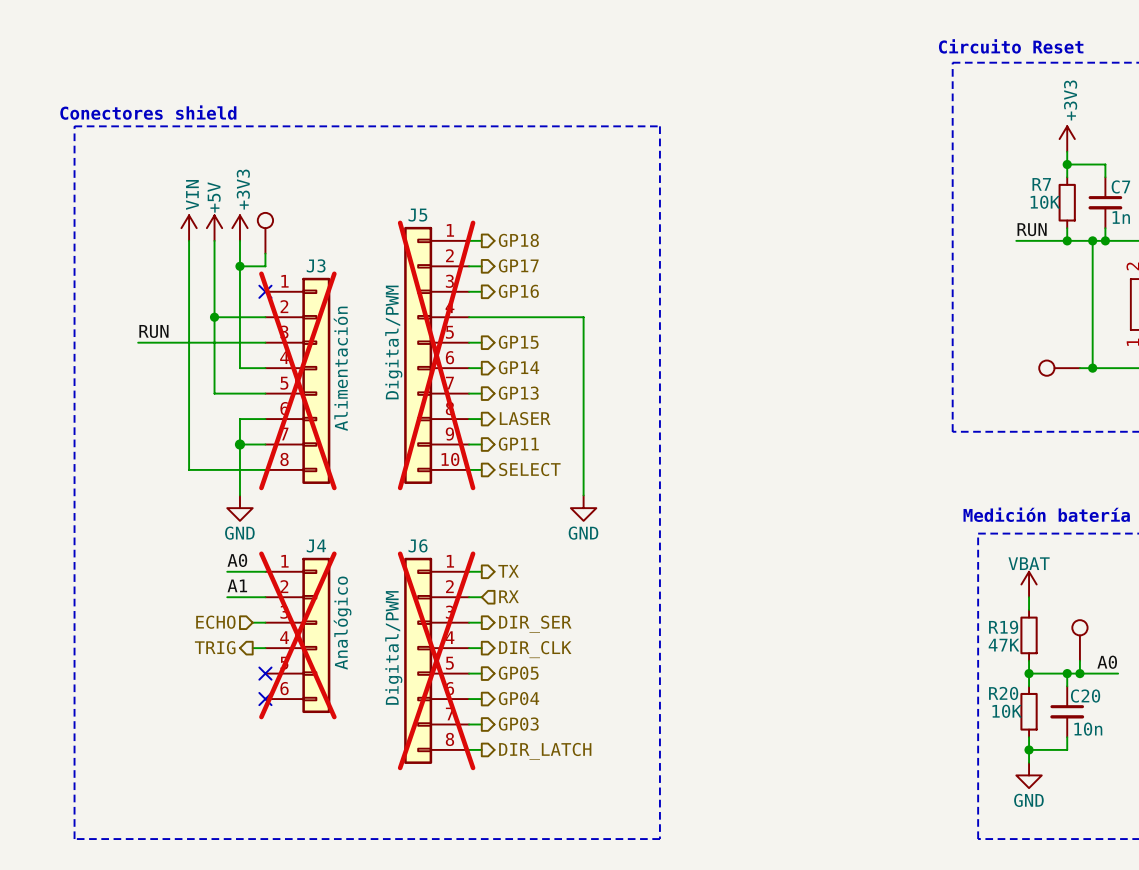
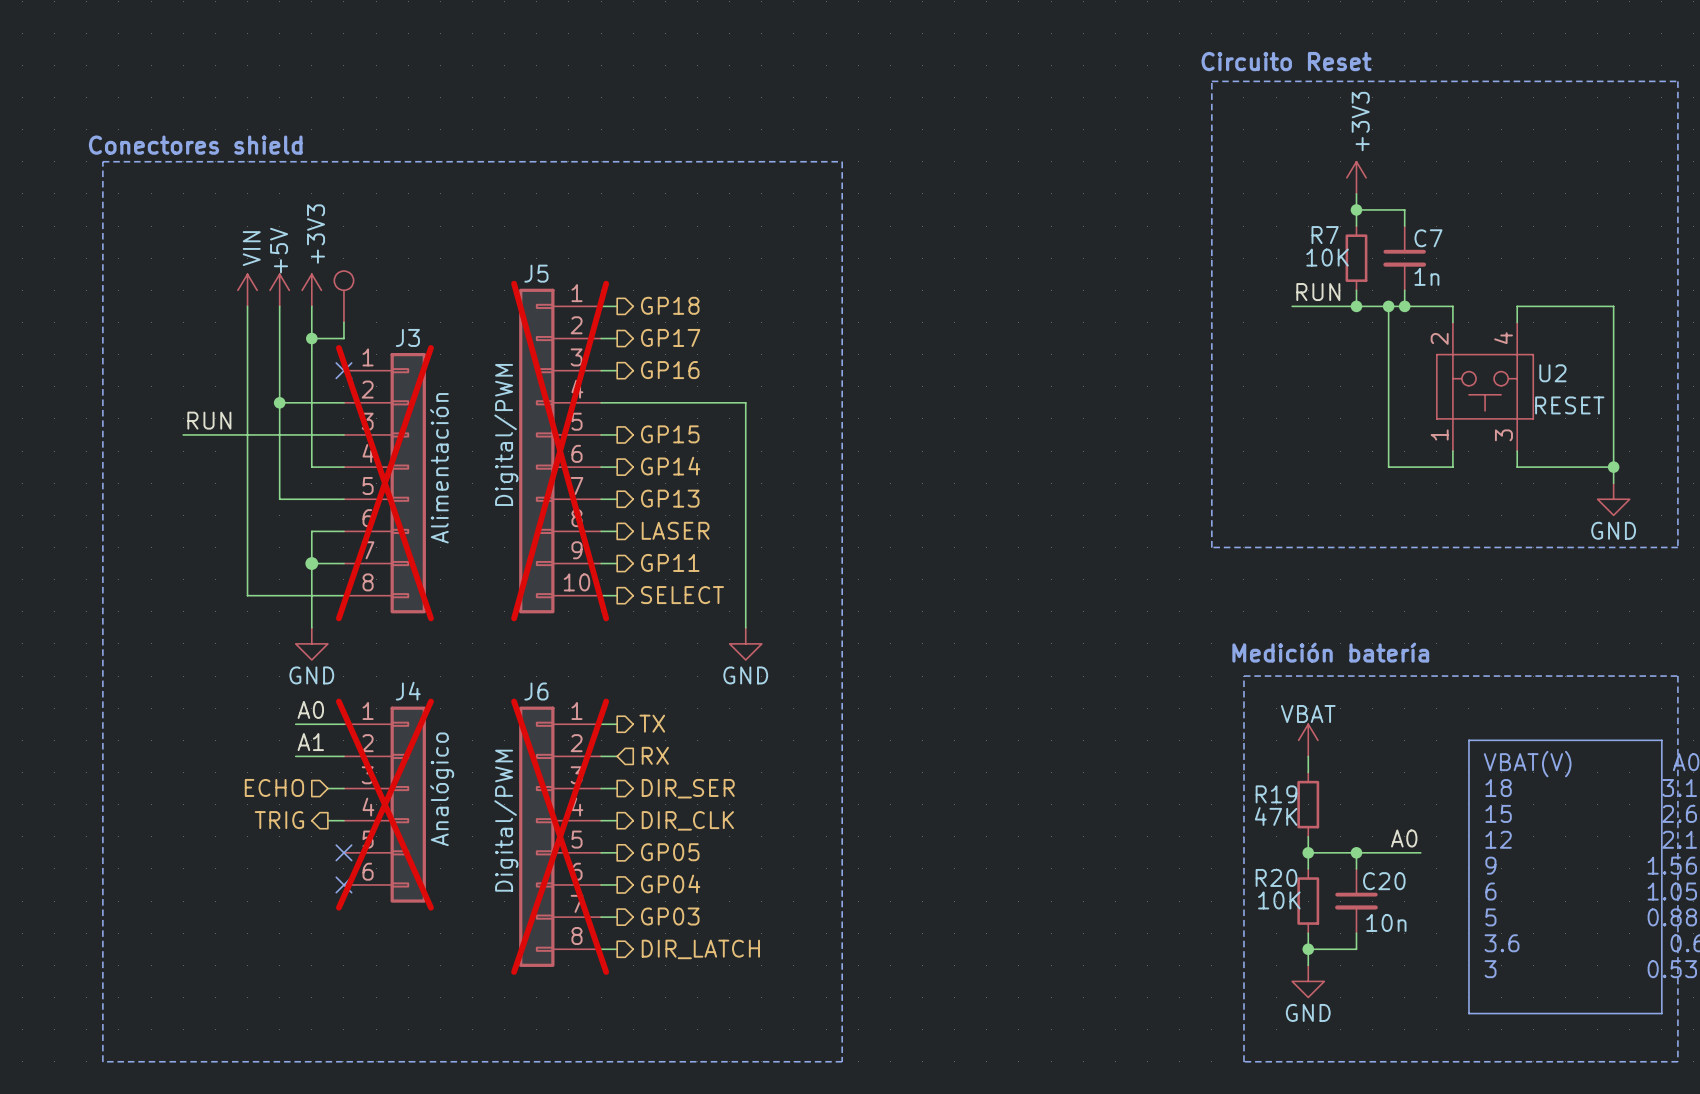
part: (1059, 368) -> none
wire: (1079, 368) (1092, 368) -> none
junction: (1092, 368) -> none
part: (1079, 640) -> none
wire: (1079, 660) (1079, 673) -> none
junction: (1079, 673) -> none

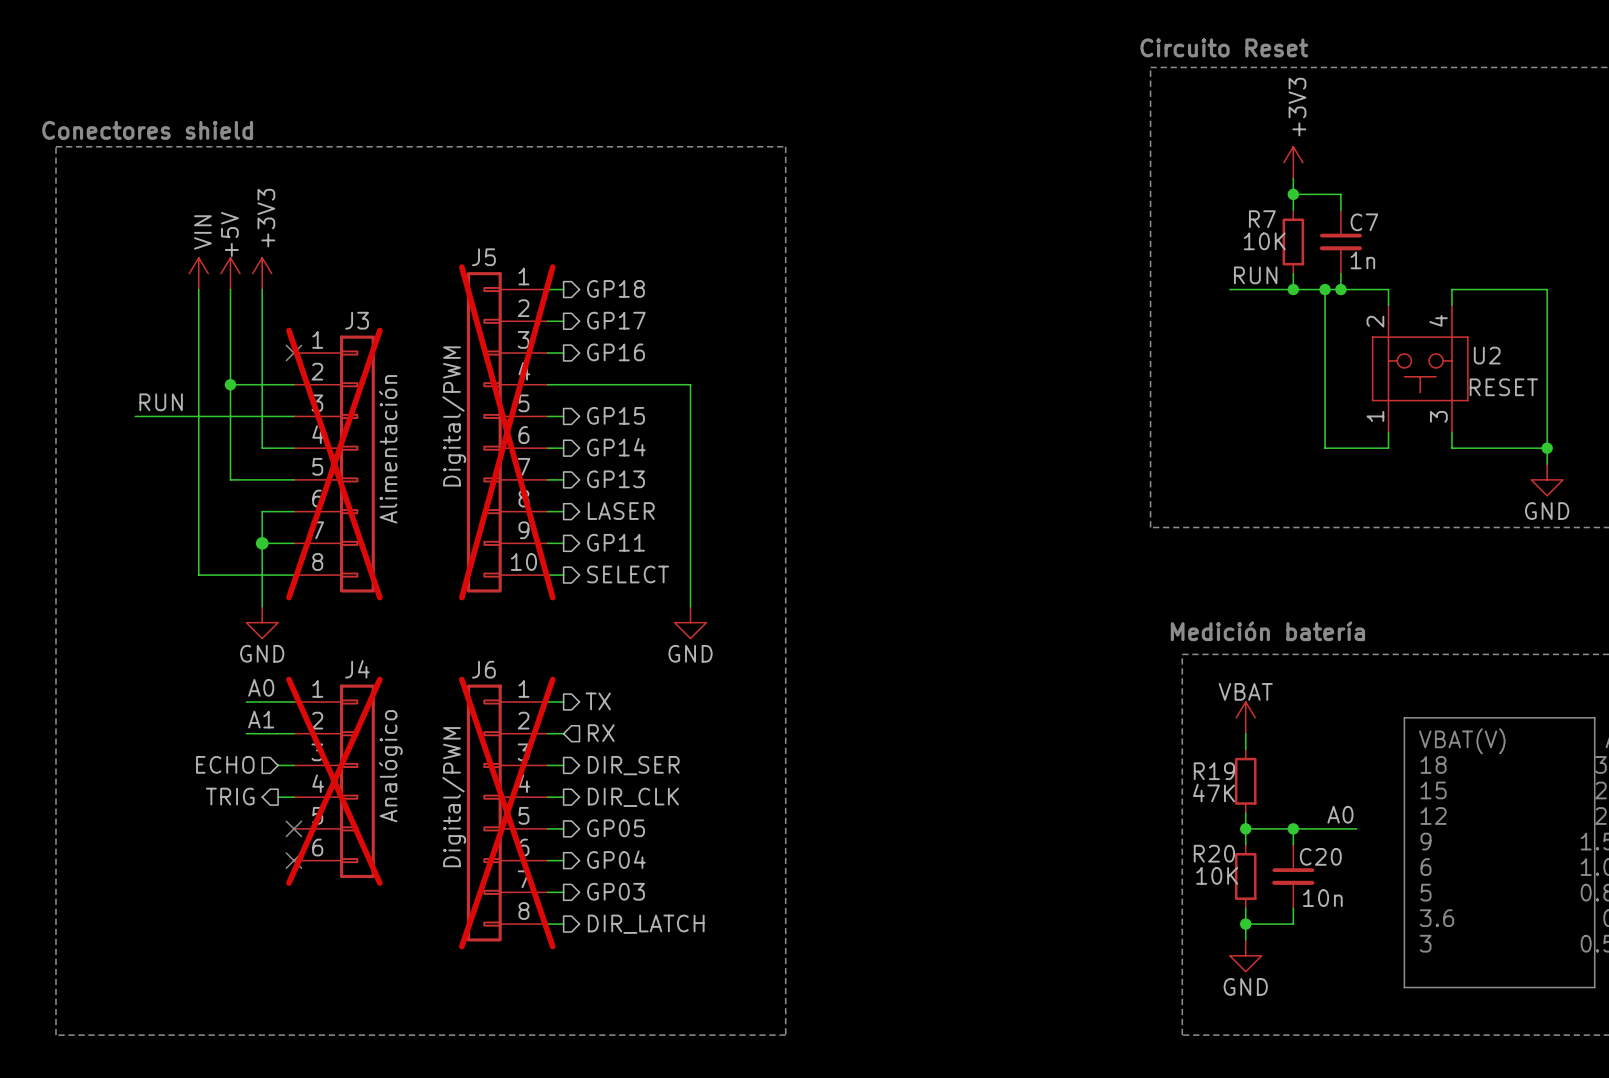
part: (343, 296) -> none
wire: (343, 322) (343, 338) (311, 338) -> none
junction: (311, 338) -> none

